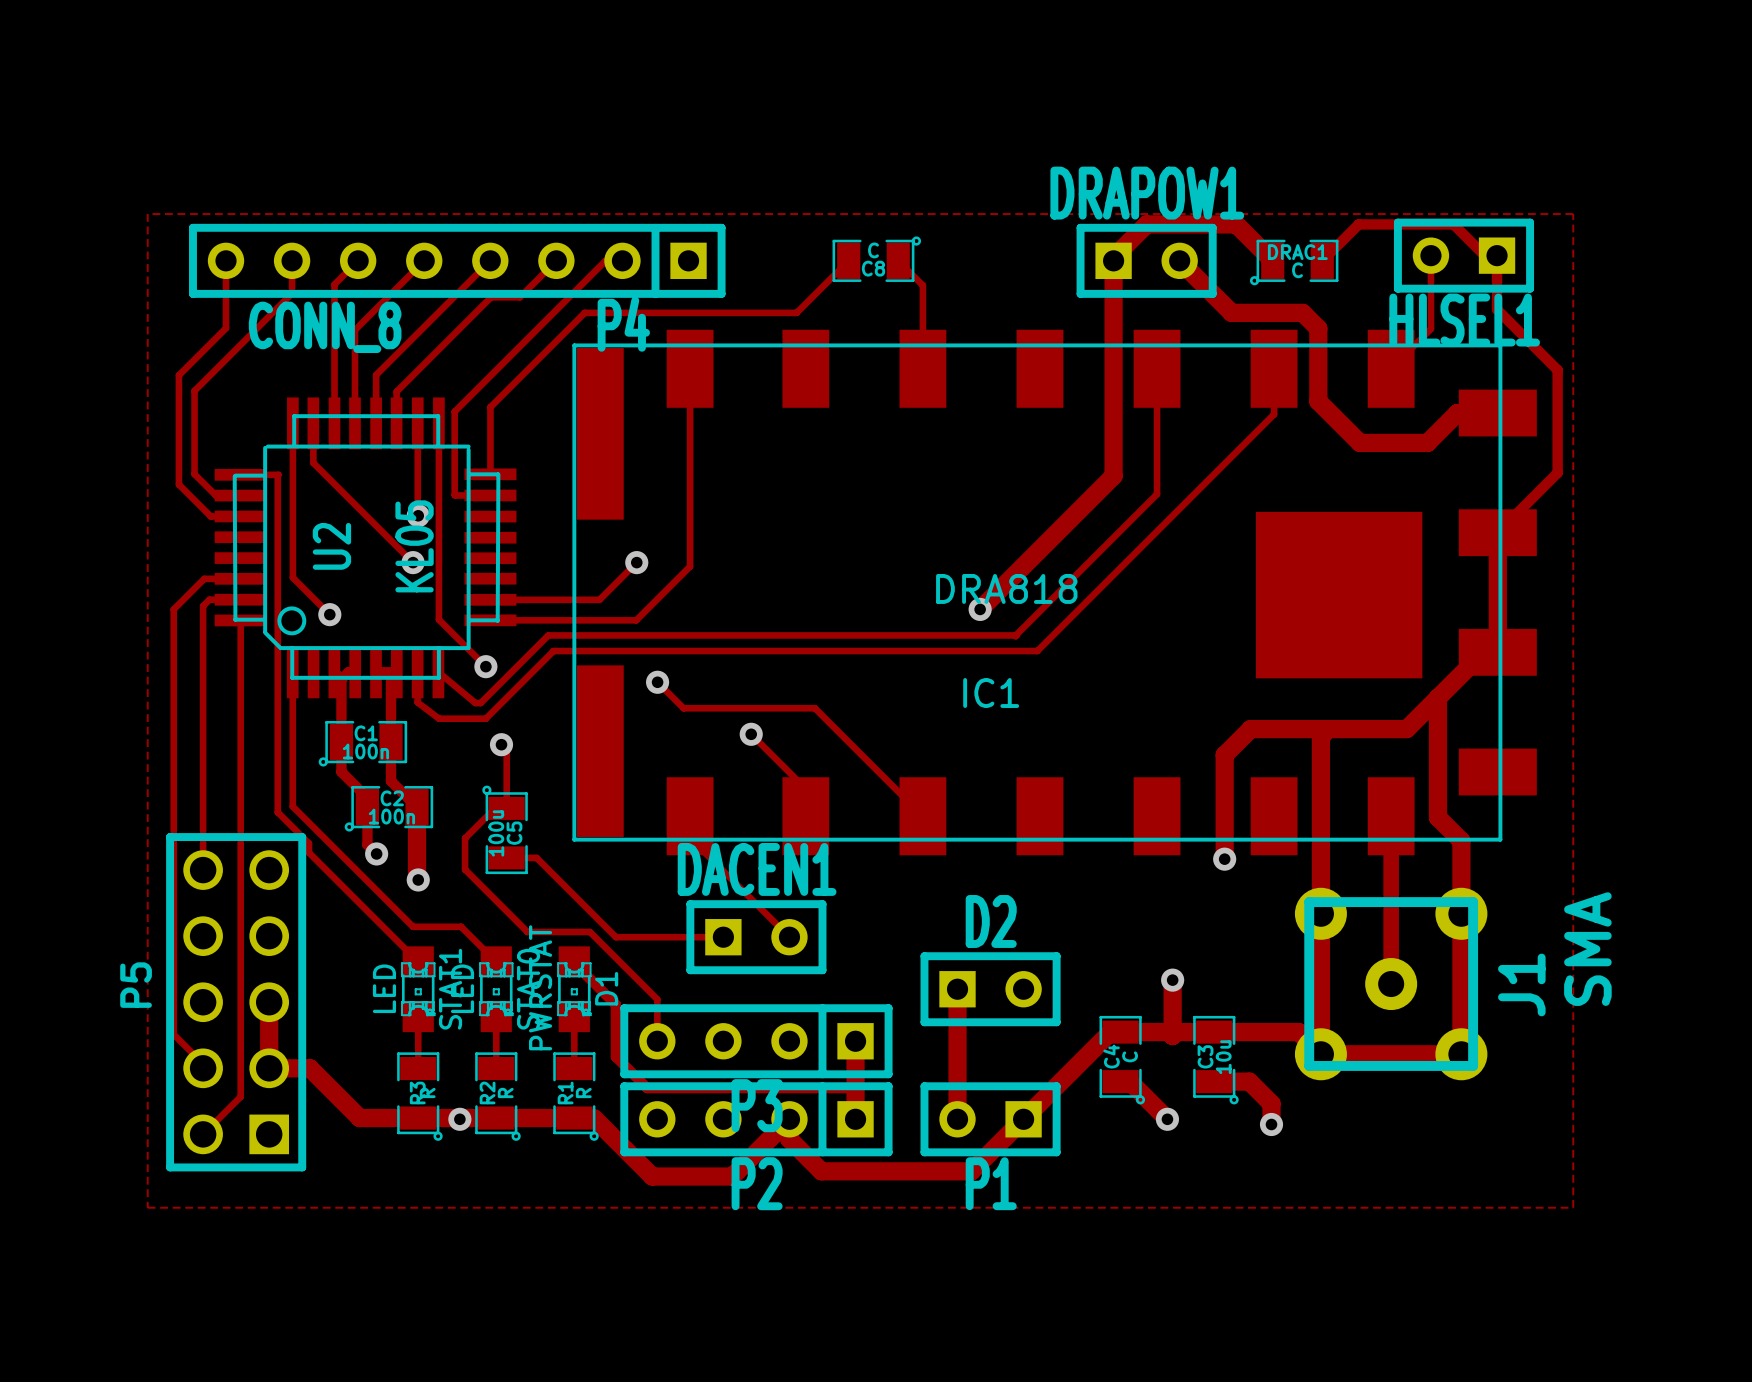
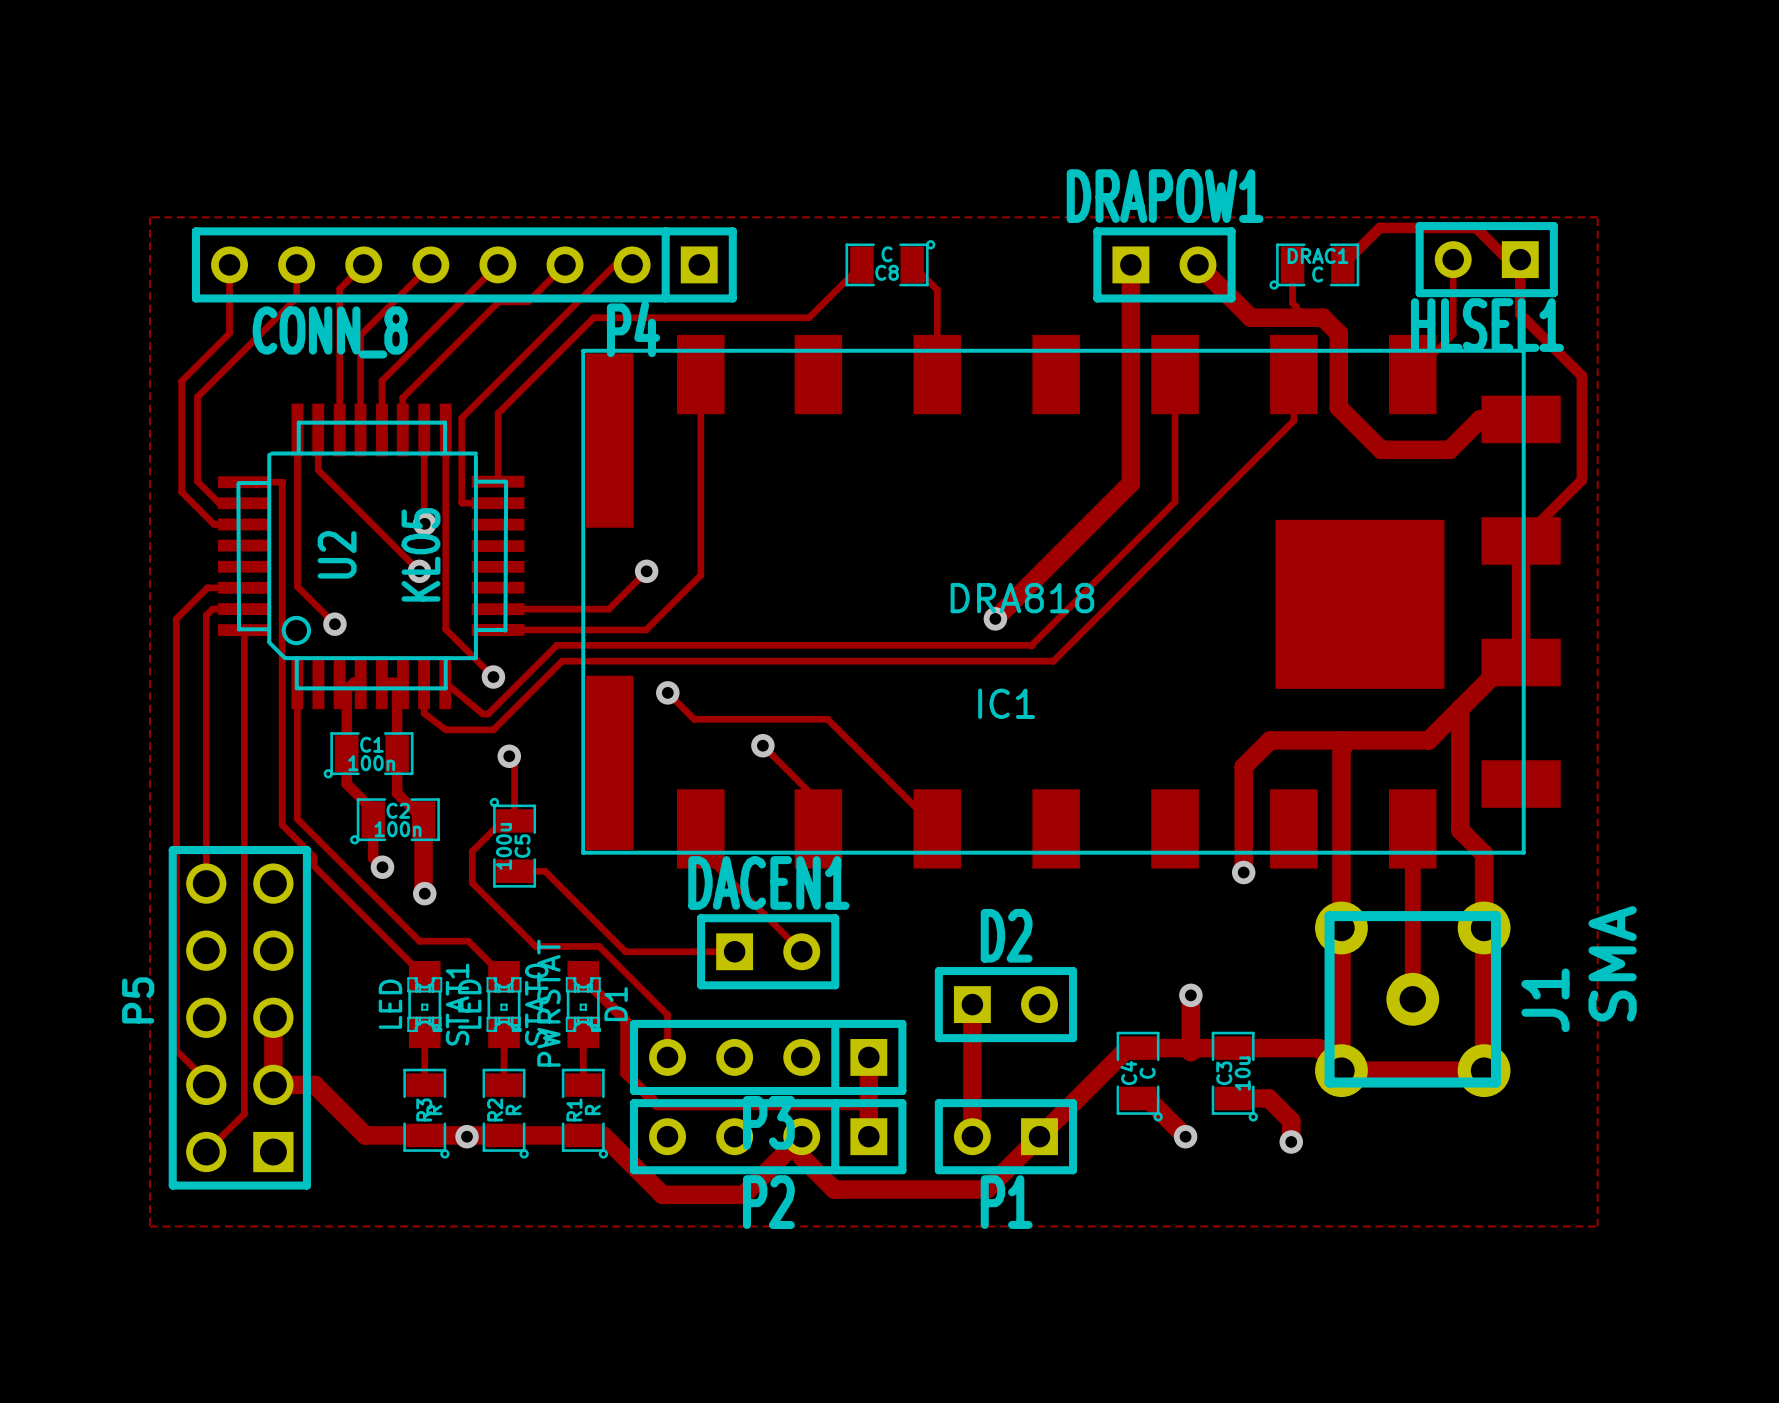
track: (1113, 260) (1113, 257) (1146, 224) (1236, 224) (1272, 260) -> (1301, 317) (1296, 317) (1296, 307) (1292, 303) (1292, 264)

